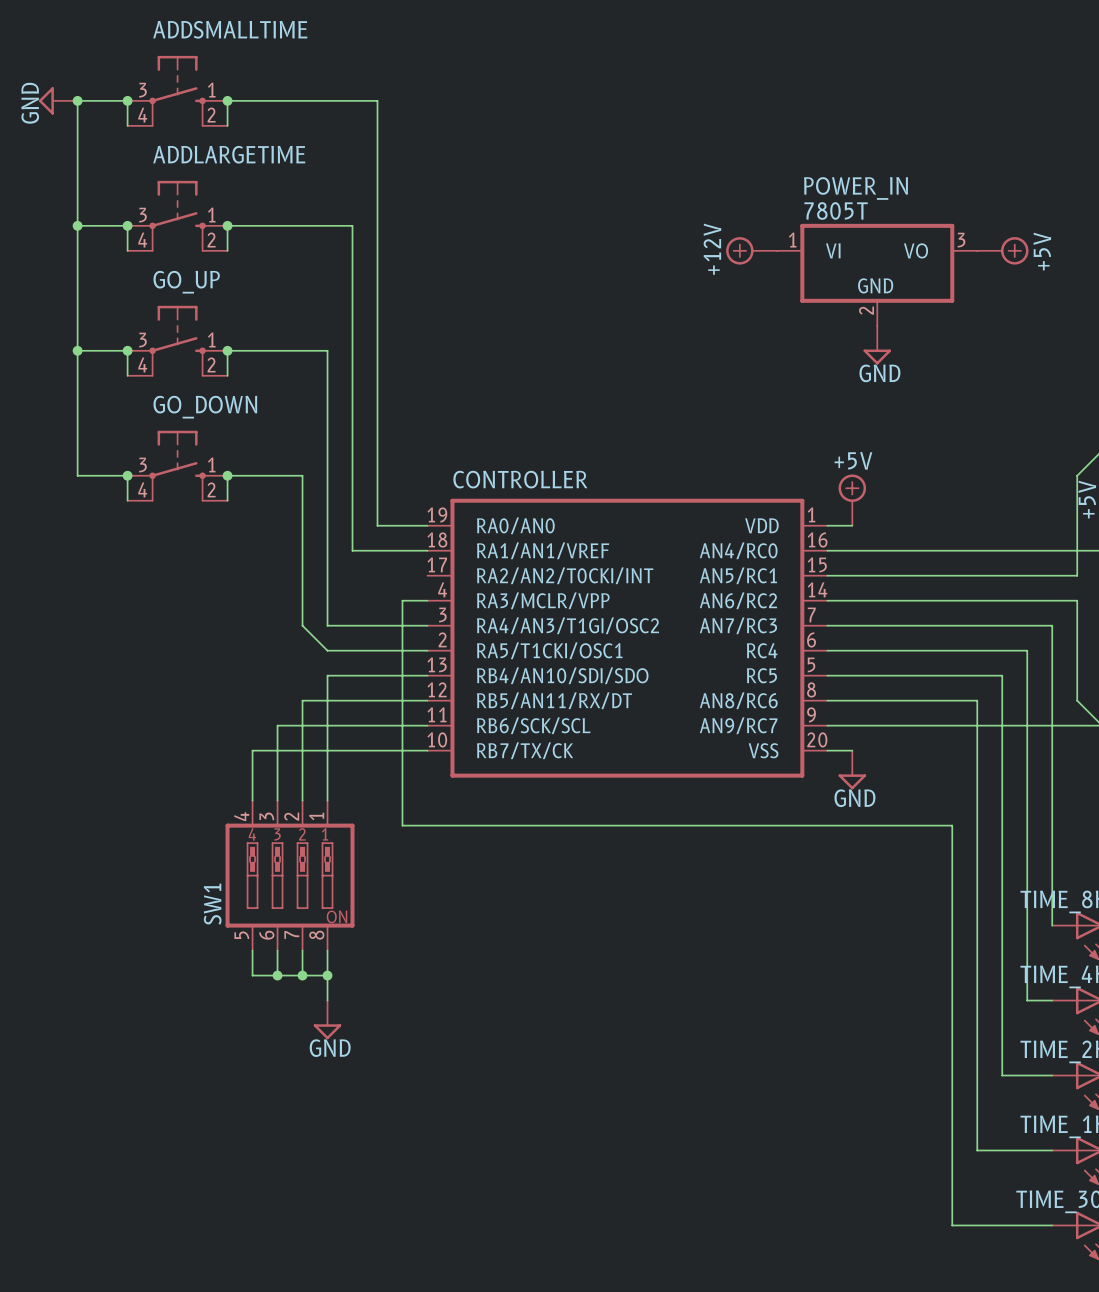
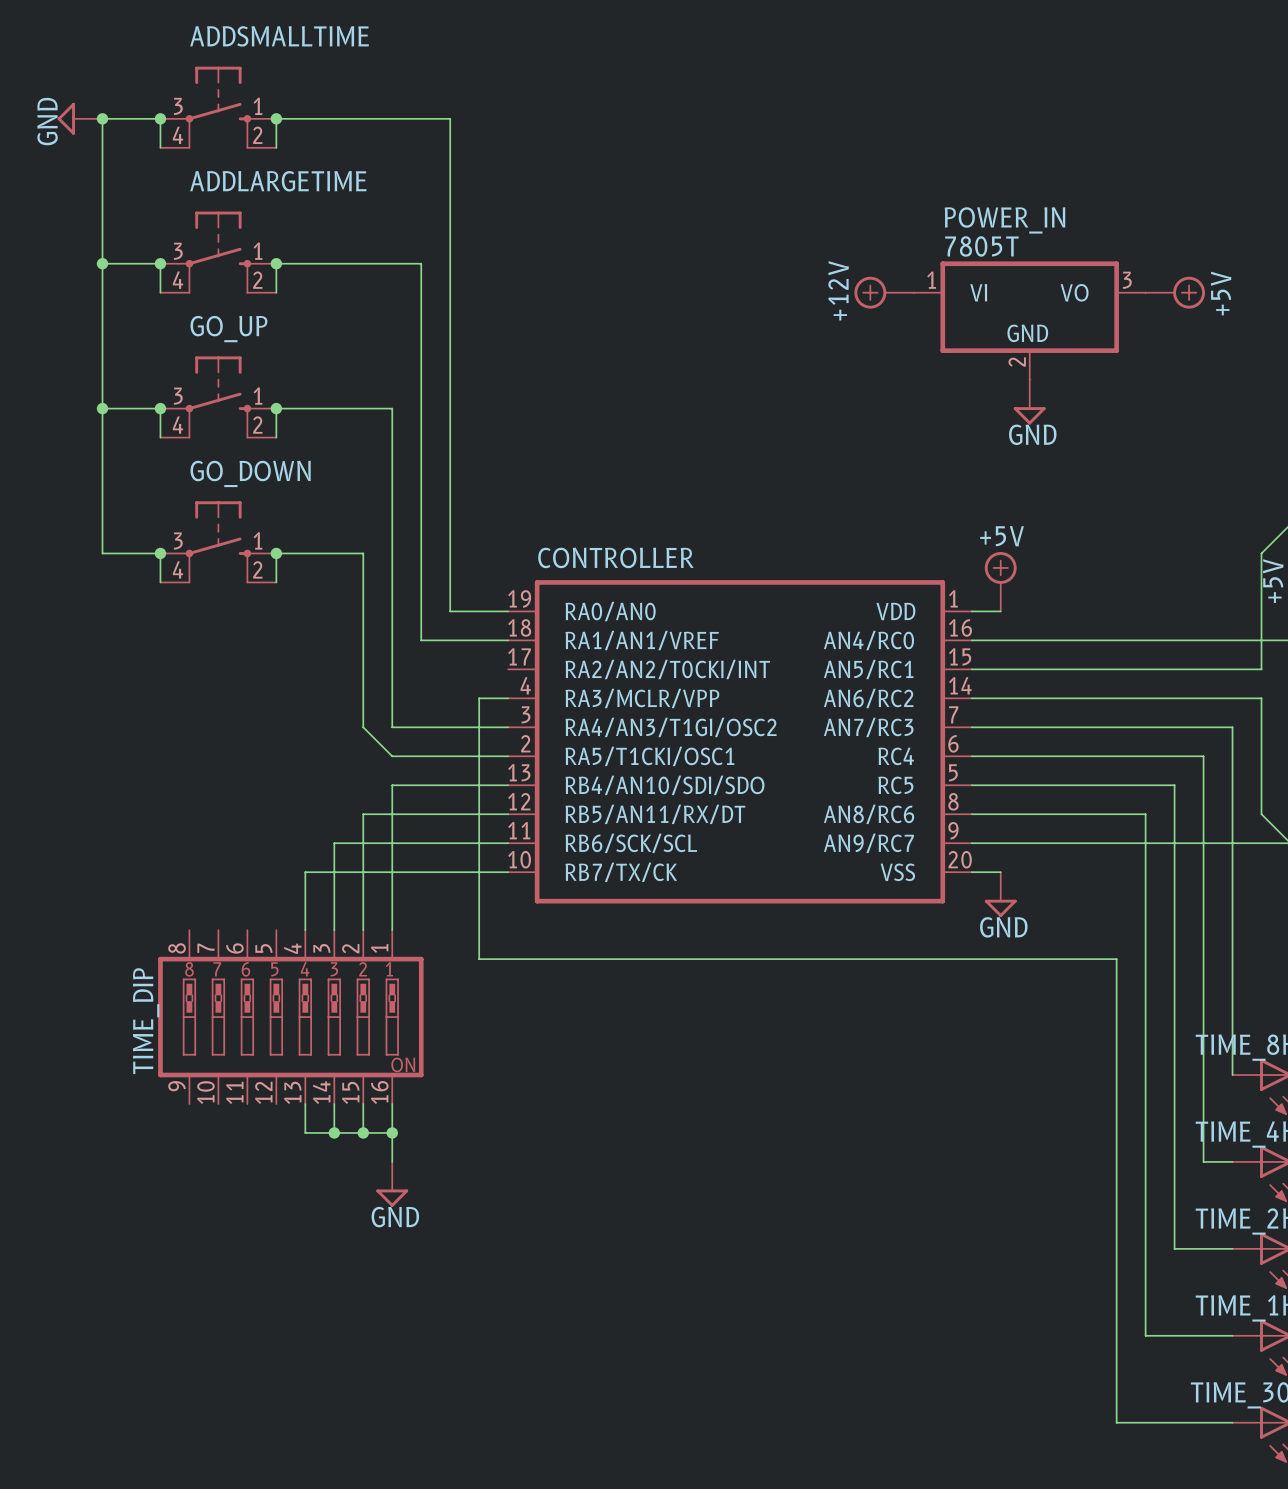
TIME_DIP: none -> (290, 1017)
SW1: (290, 875) -> none

